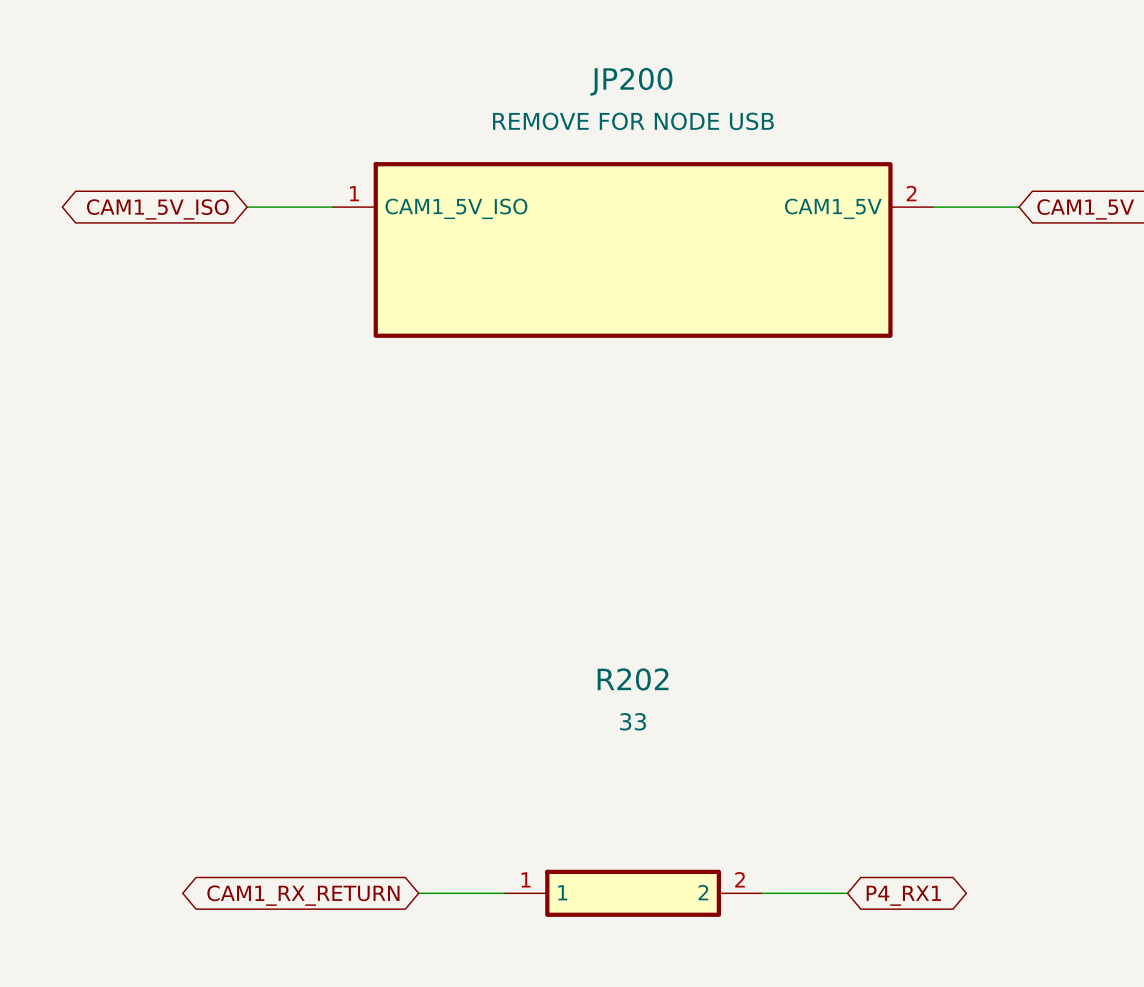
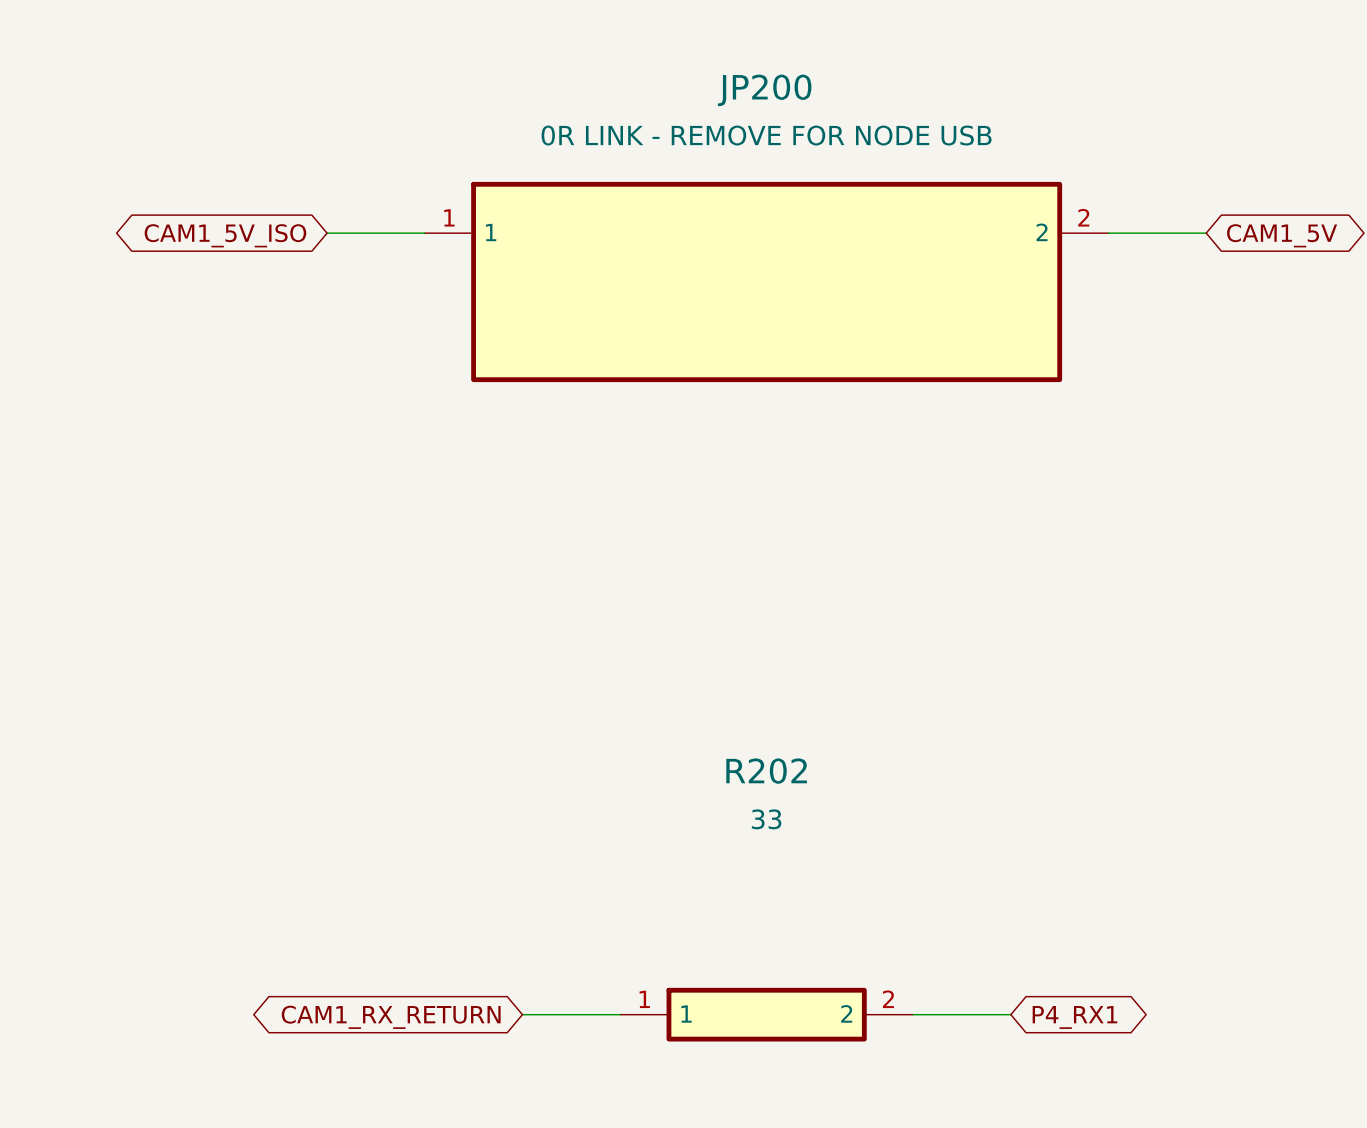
JP200 value: REMOVE FOR NODE USB (633, 121) -> 0R LINK - REMOVE FOR NODE USB (766, 135)
JP200 pin name: CAM1_5V_ISO (456, 208) -> 1 (491, 232)
JP200 pin name: CAM1_5V (833, 208) -> 2 (1042, 232)

